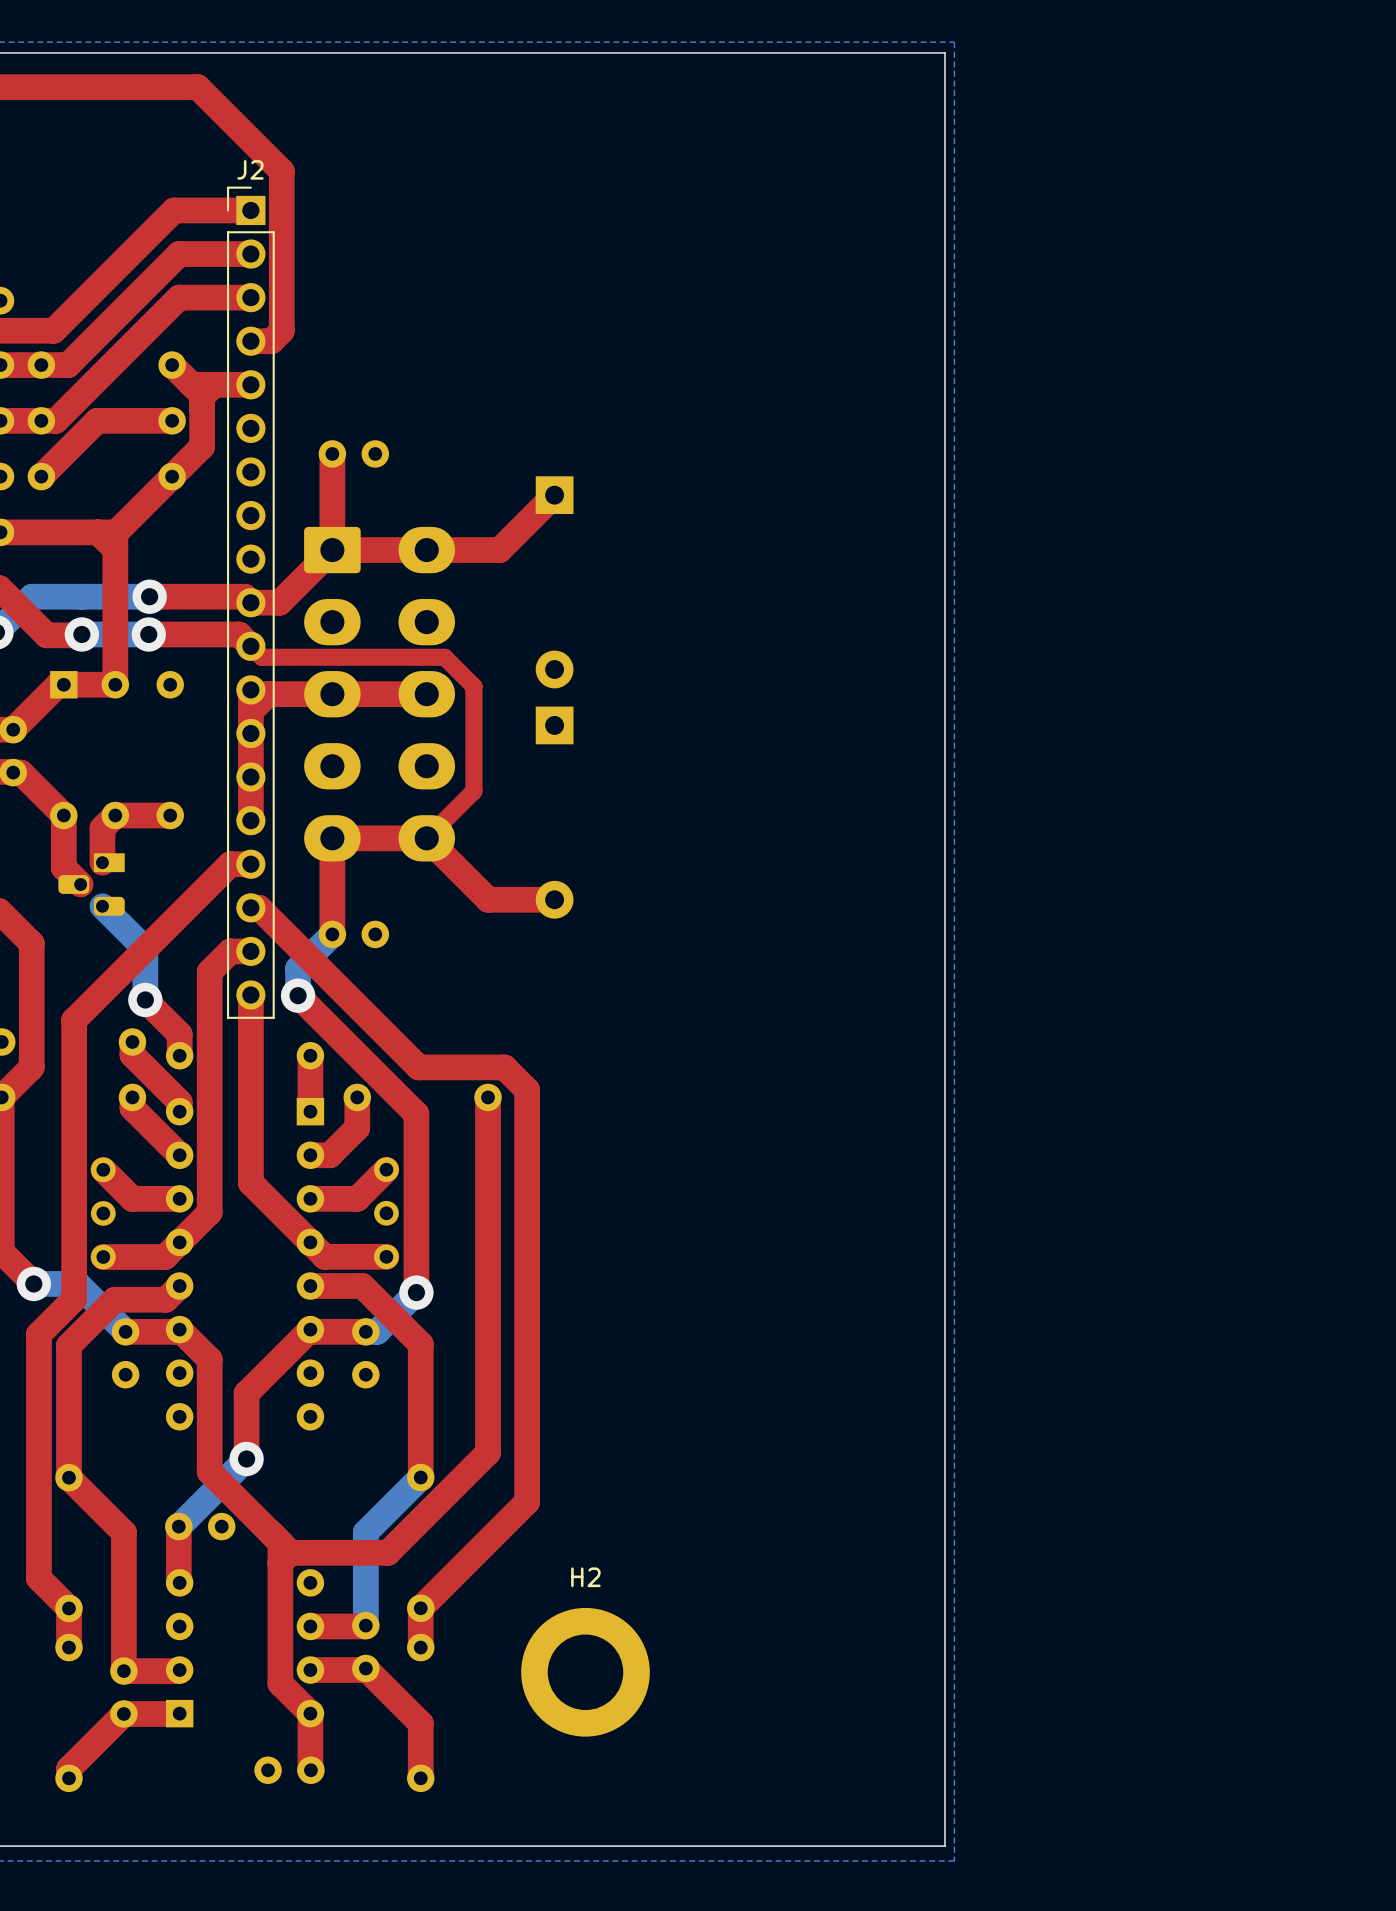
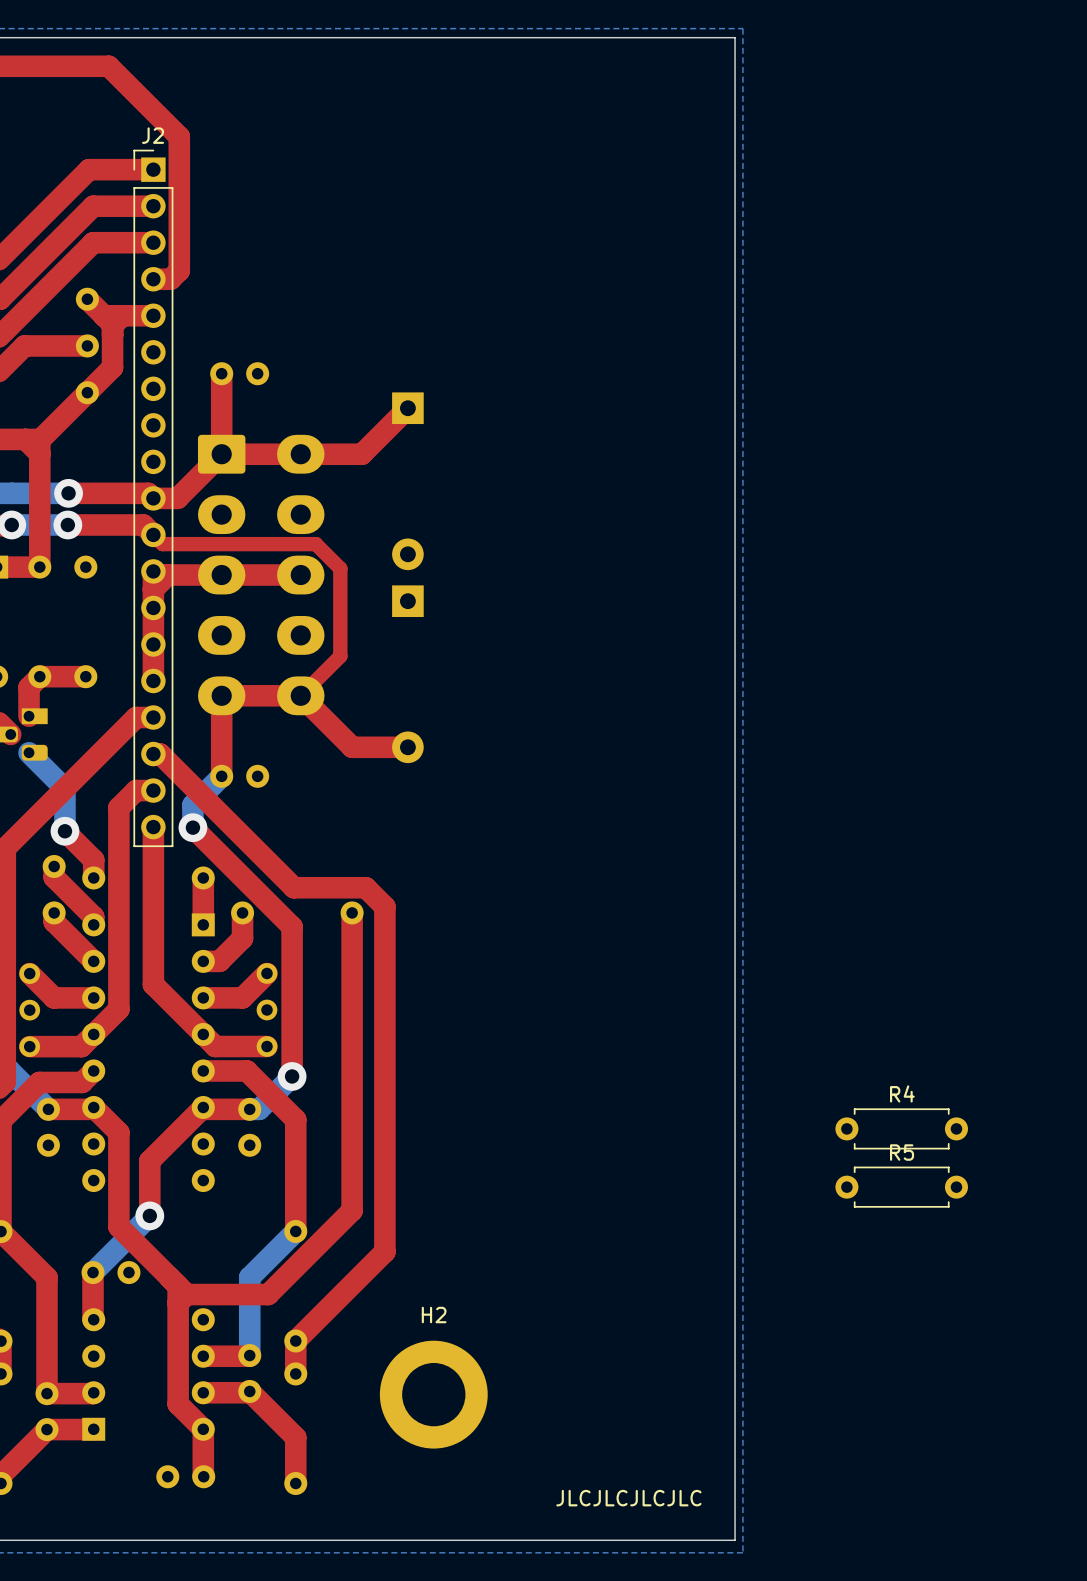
R4: none -> (901, 1128)
R5: none -> (901, 1187)
text: none -> JLCJLCJLCJLC (628, 1498)

